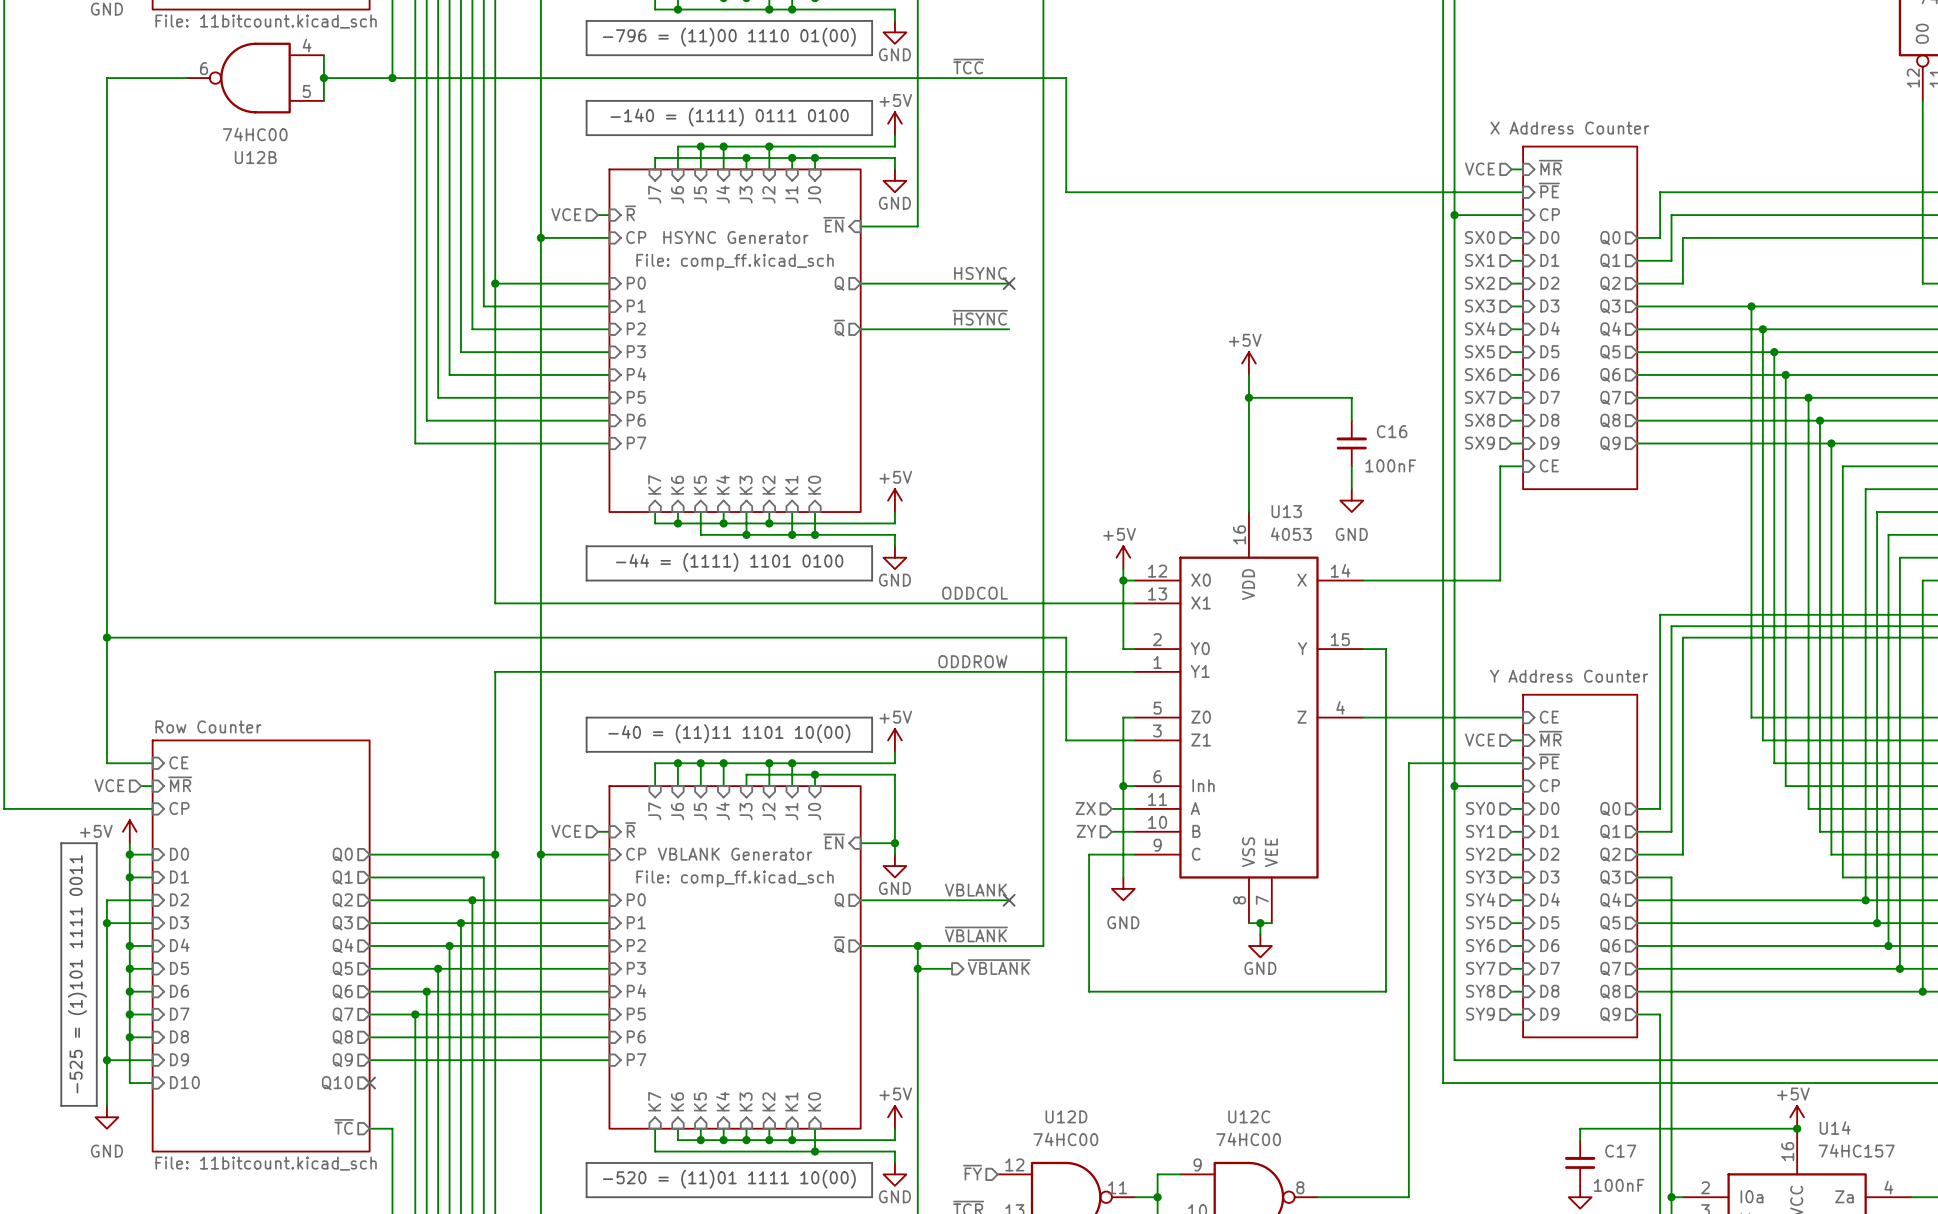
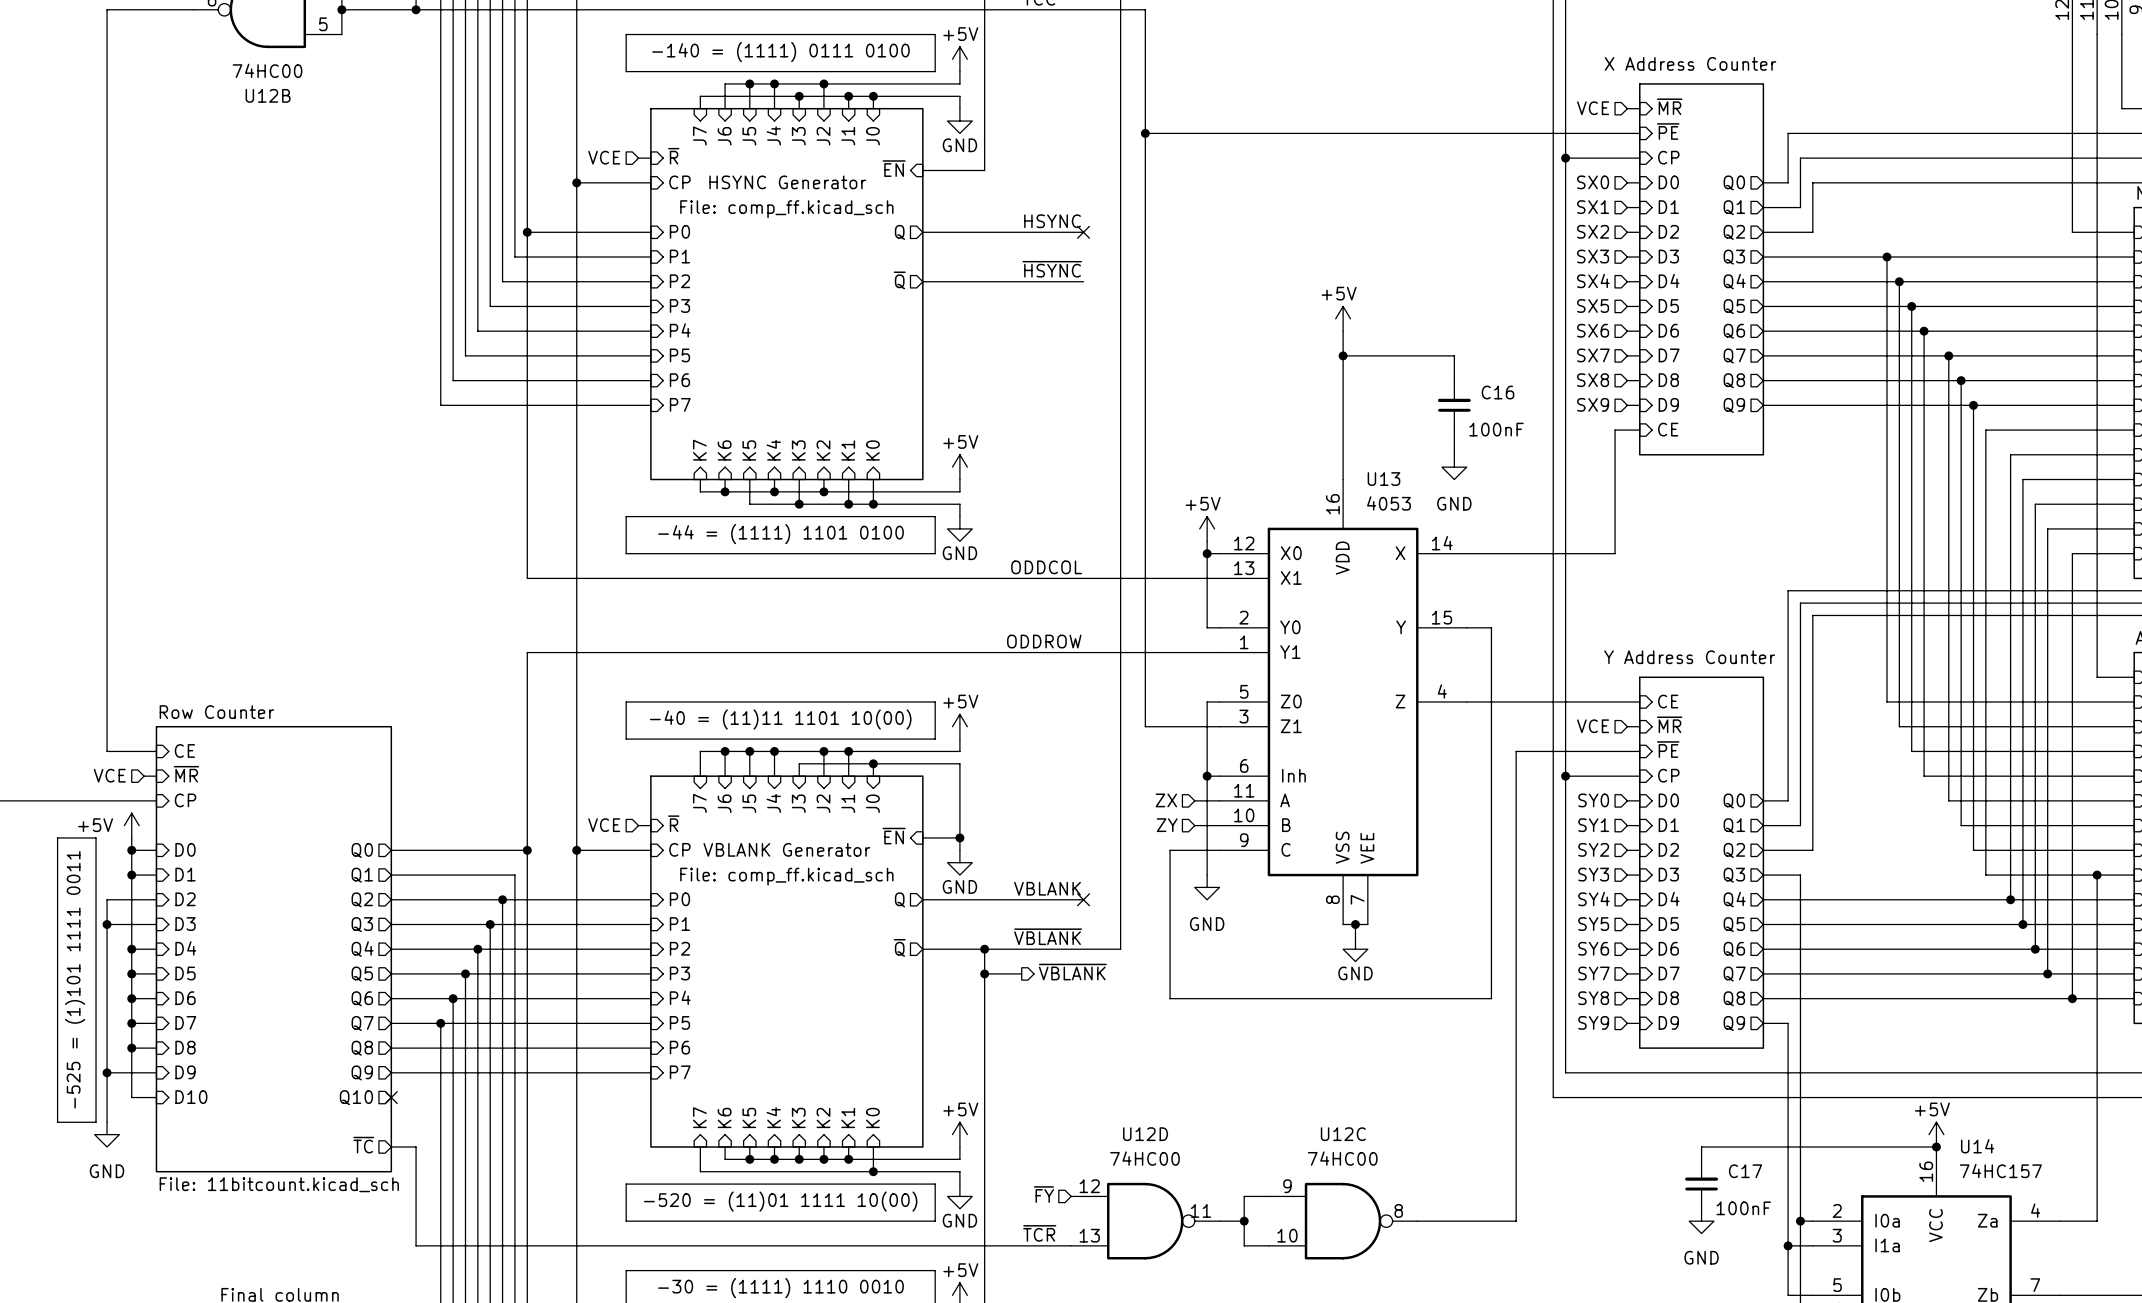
junction: none -> (1145, 133)
wire: (106, 637) (1066, 637) -> (1145, 133) (1145, 615)
junction: (106, 637) -> none

